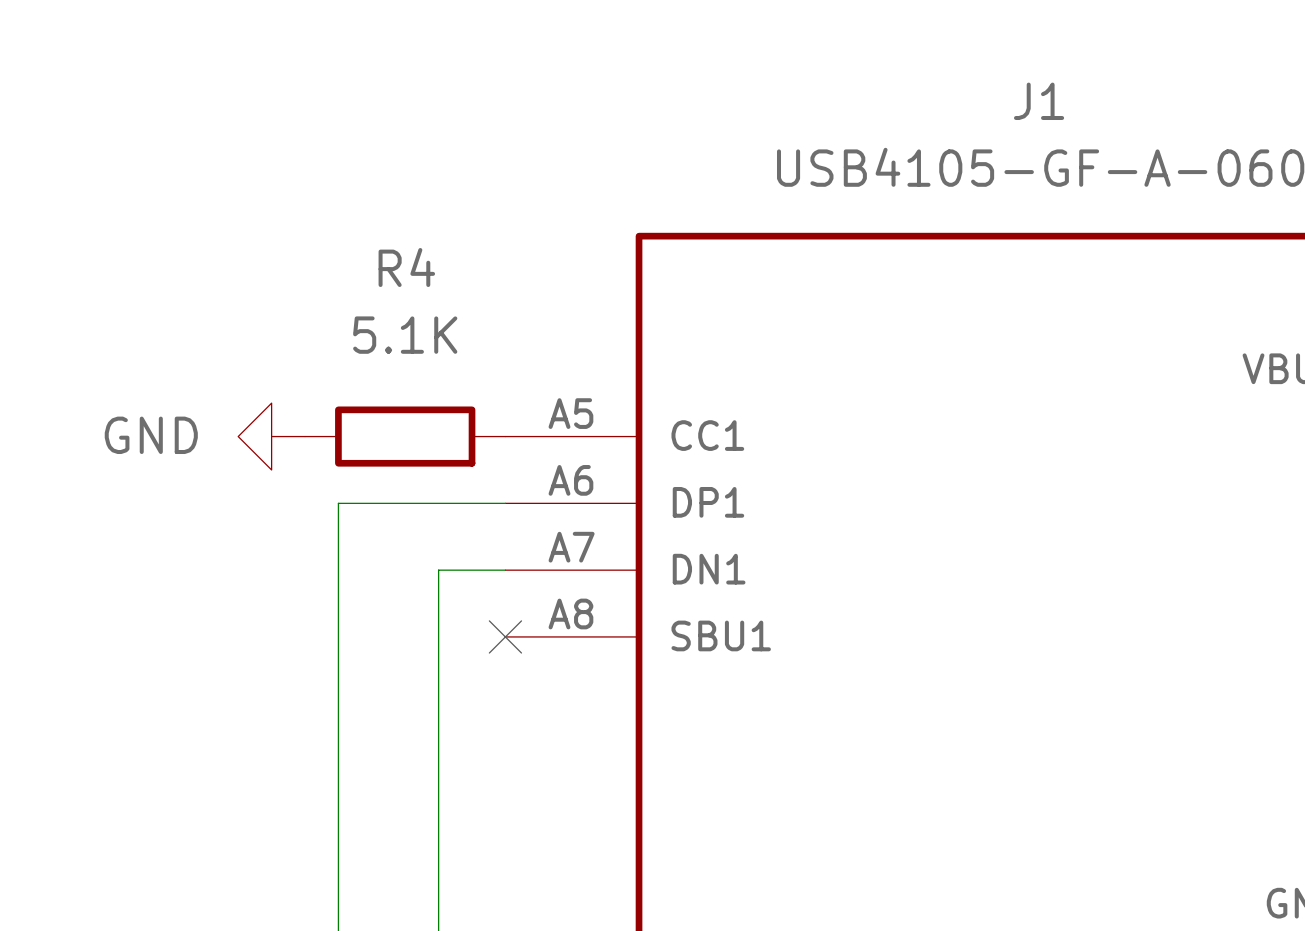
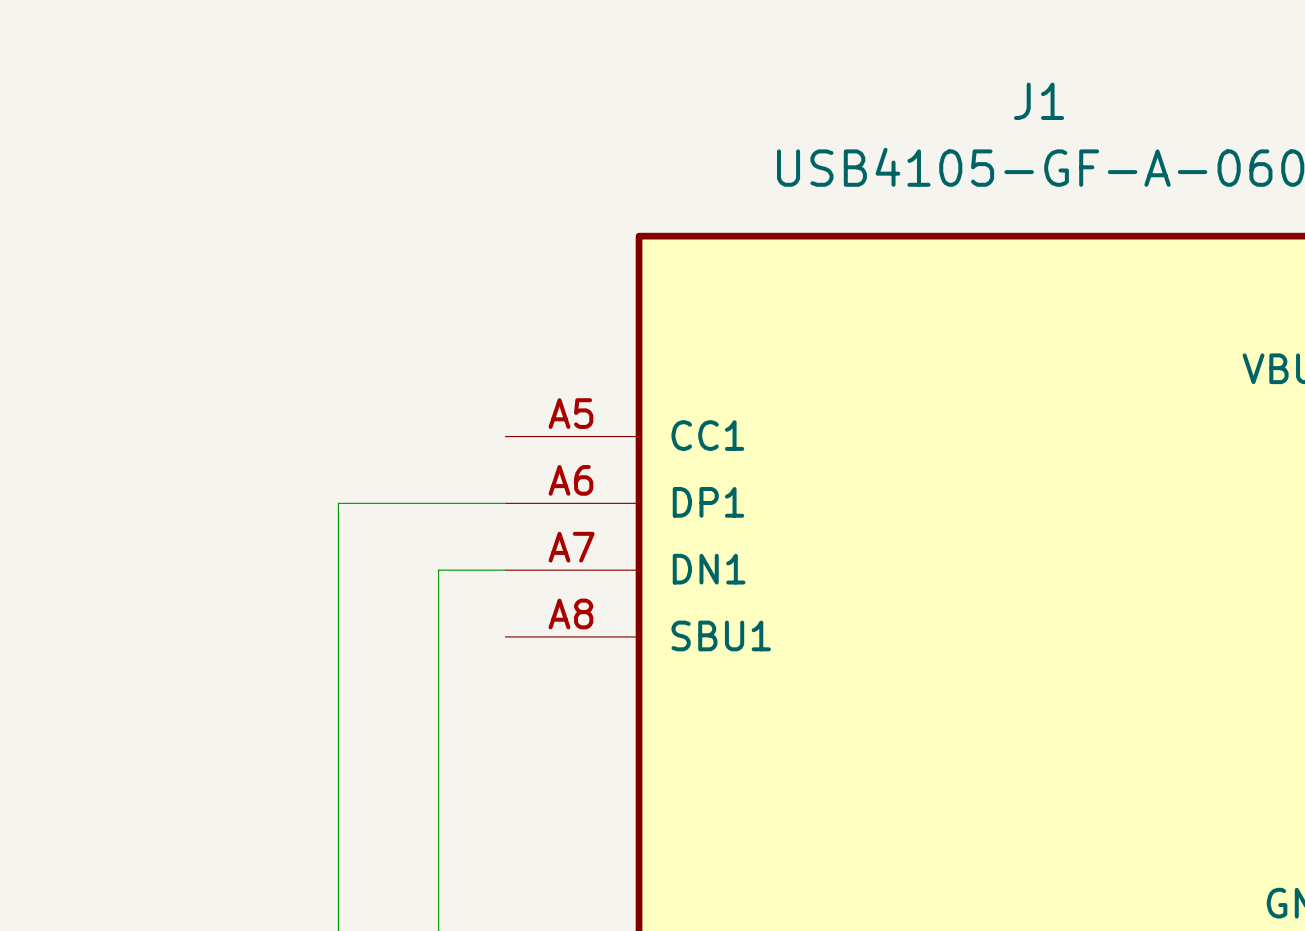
power symbol: GND (271, 436) -> none
R4: 5.1K (405, 436) -> none
no-connect mark: (505, 636) -> none

